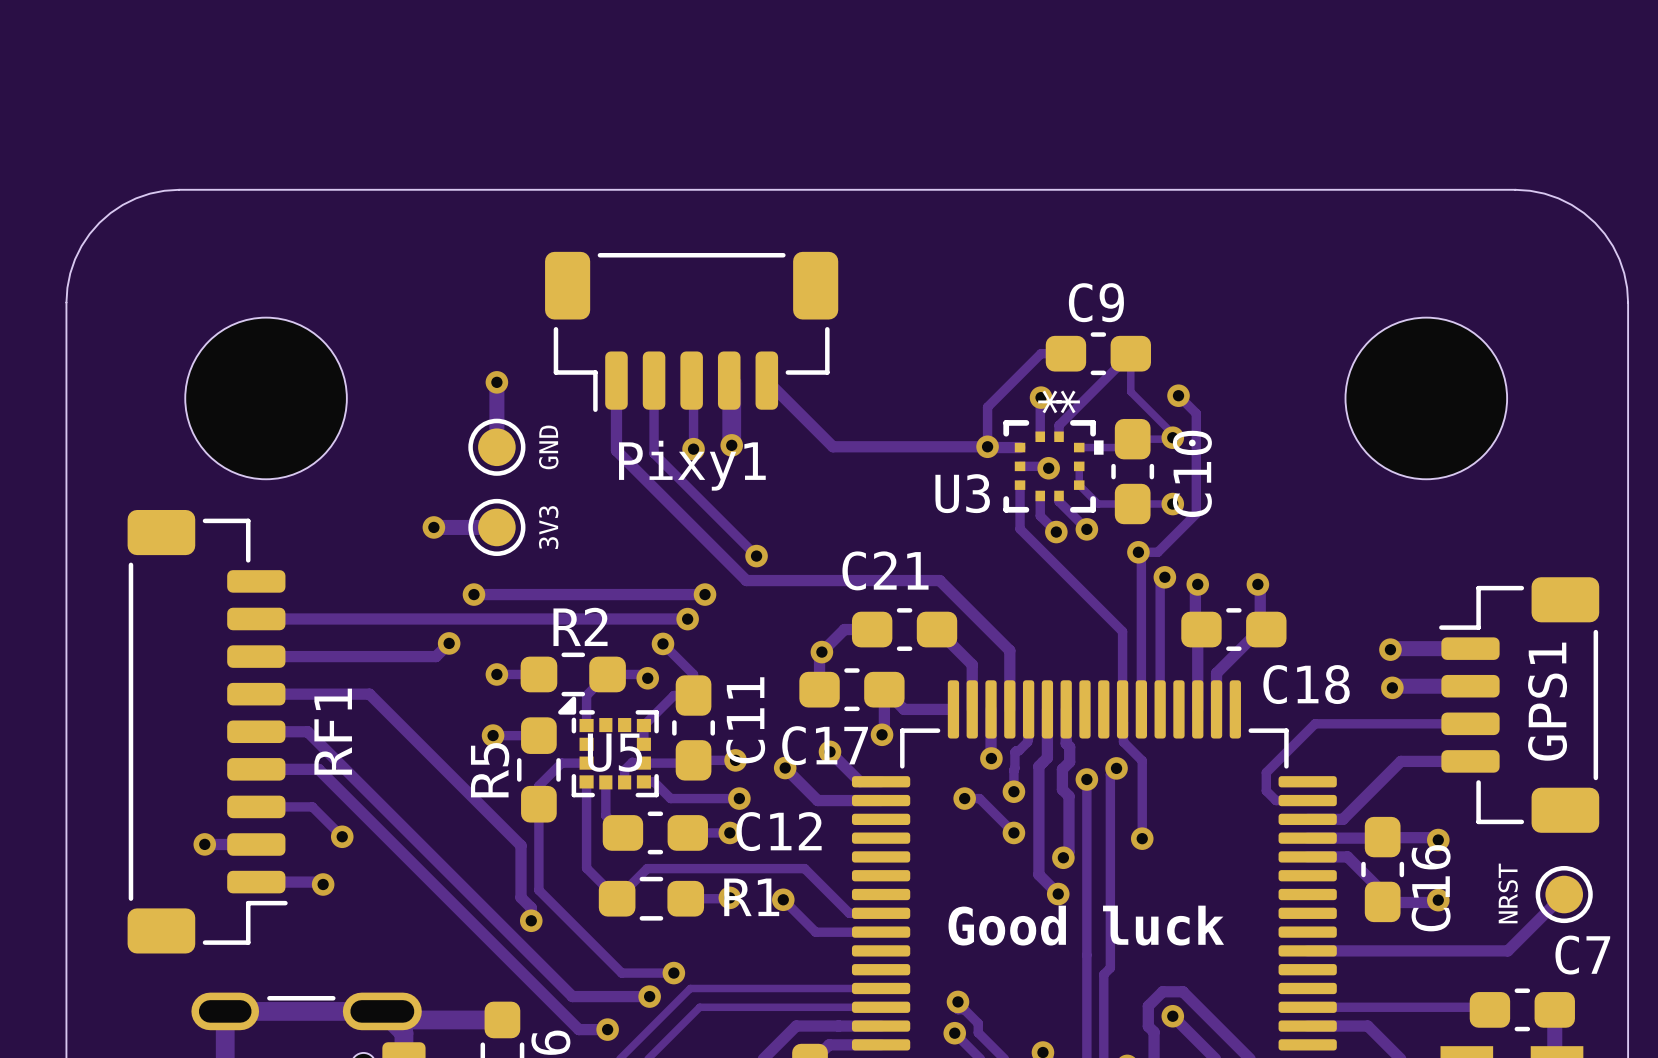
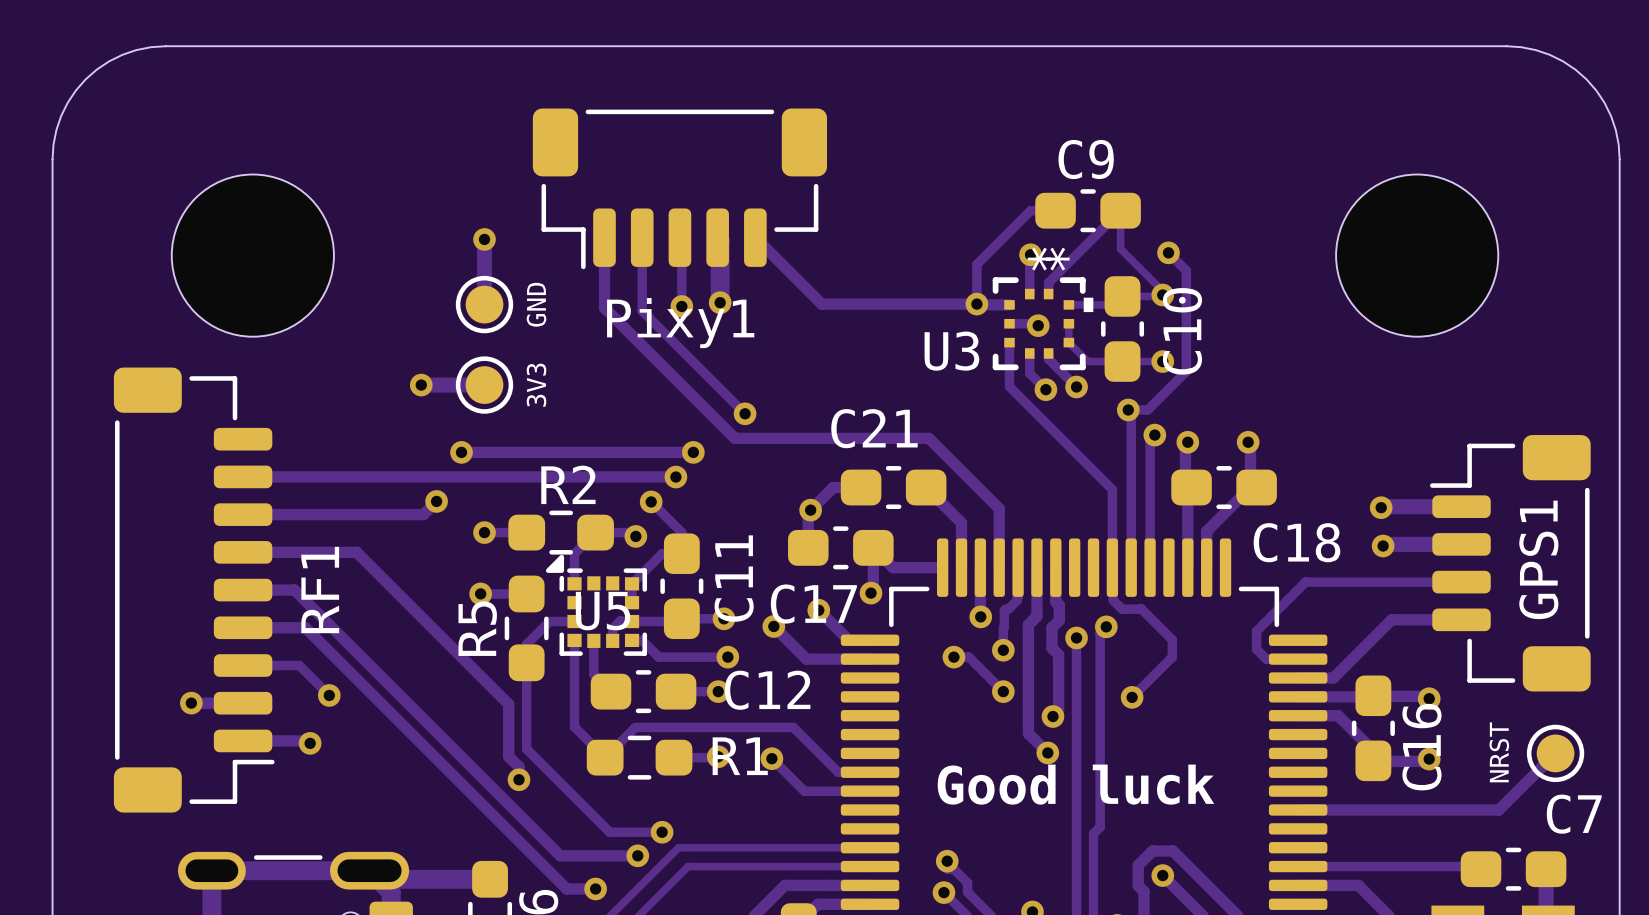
track: (1132, 750) (1142, 760) (1142, 838) -> (1122, 609) (1141, 608) (1172, 639) (1172, 657) (1132, 697)

